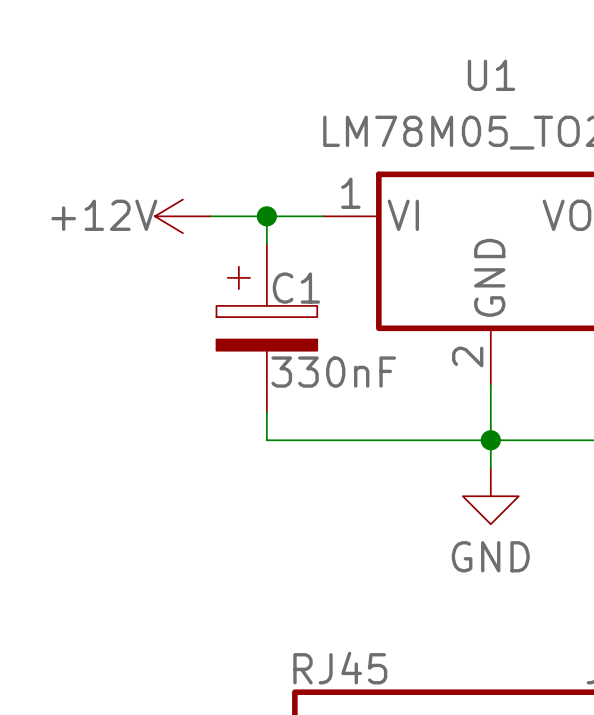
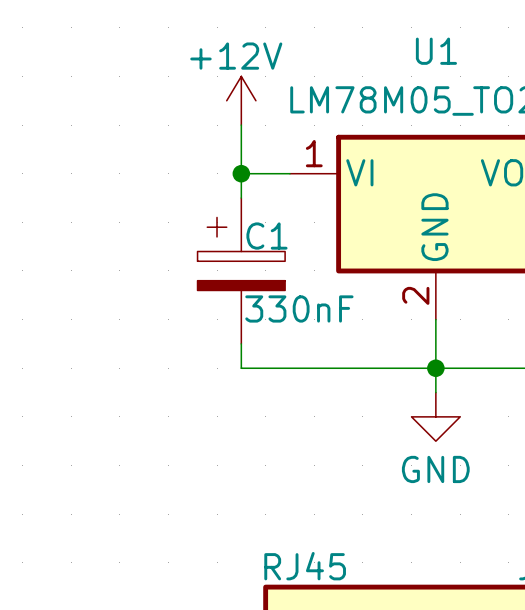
power symbol rotation: 0° (182, 216) -> 90° clockwise (241, 100)
power symbol position: +12V (182, 216) -> +12V (241, 100)
wire: (210, 216) (266, 216) -> (241, 125) (241, 173)

